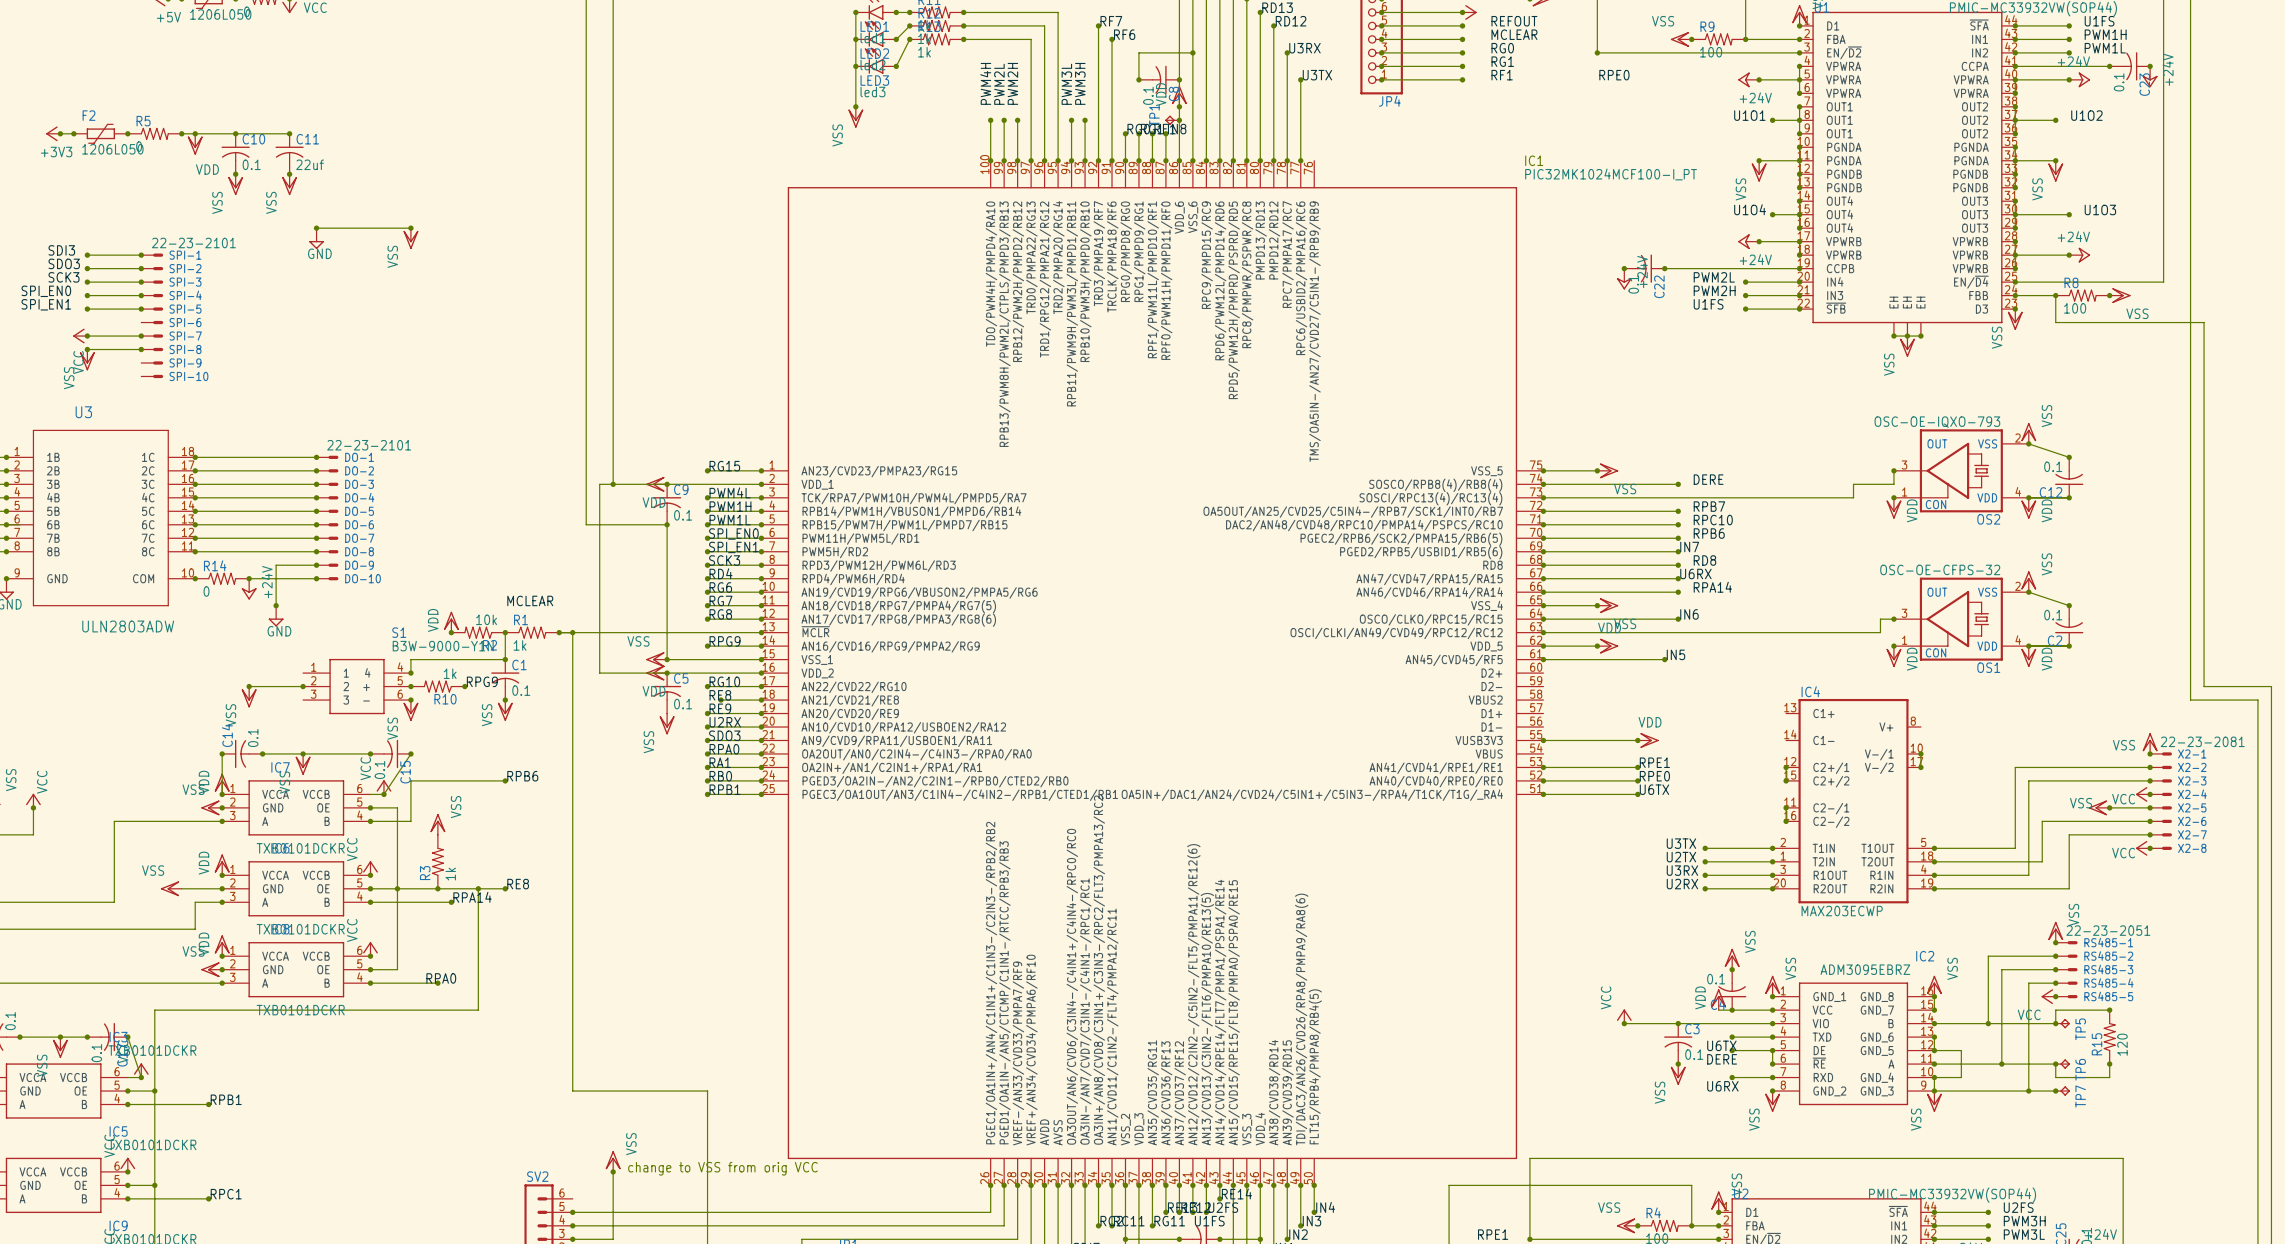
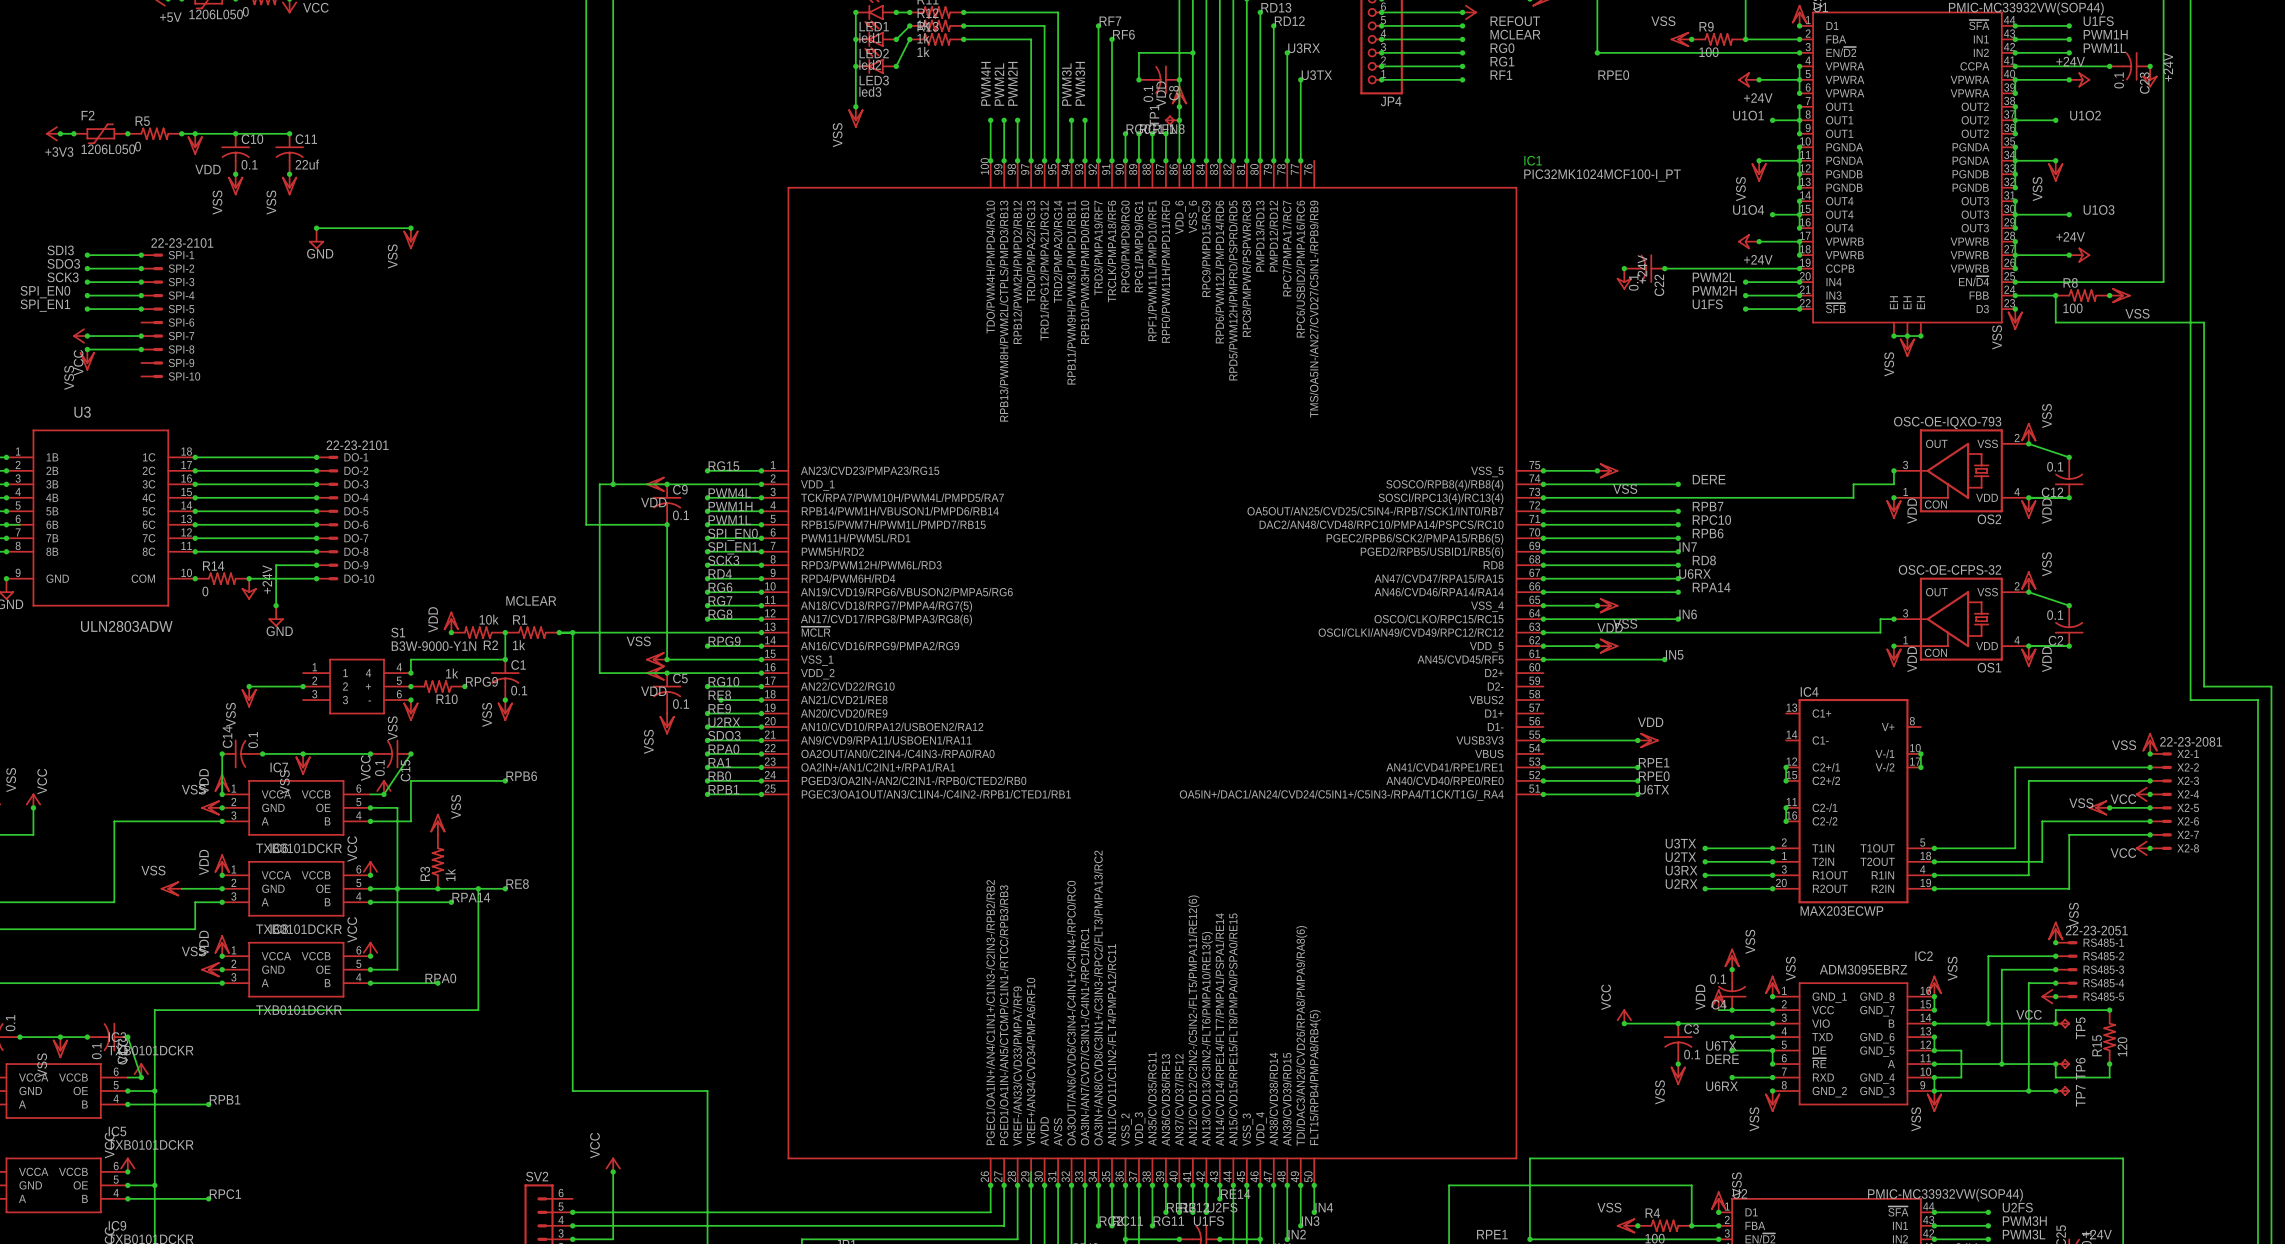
power symbol: VSS (613, 1161) -> VCC (613, 1164)
text: change to VSS from orig VCC (723, 1168) -> none

